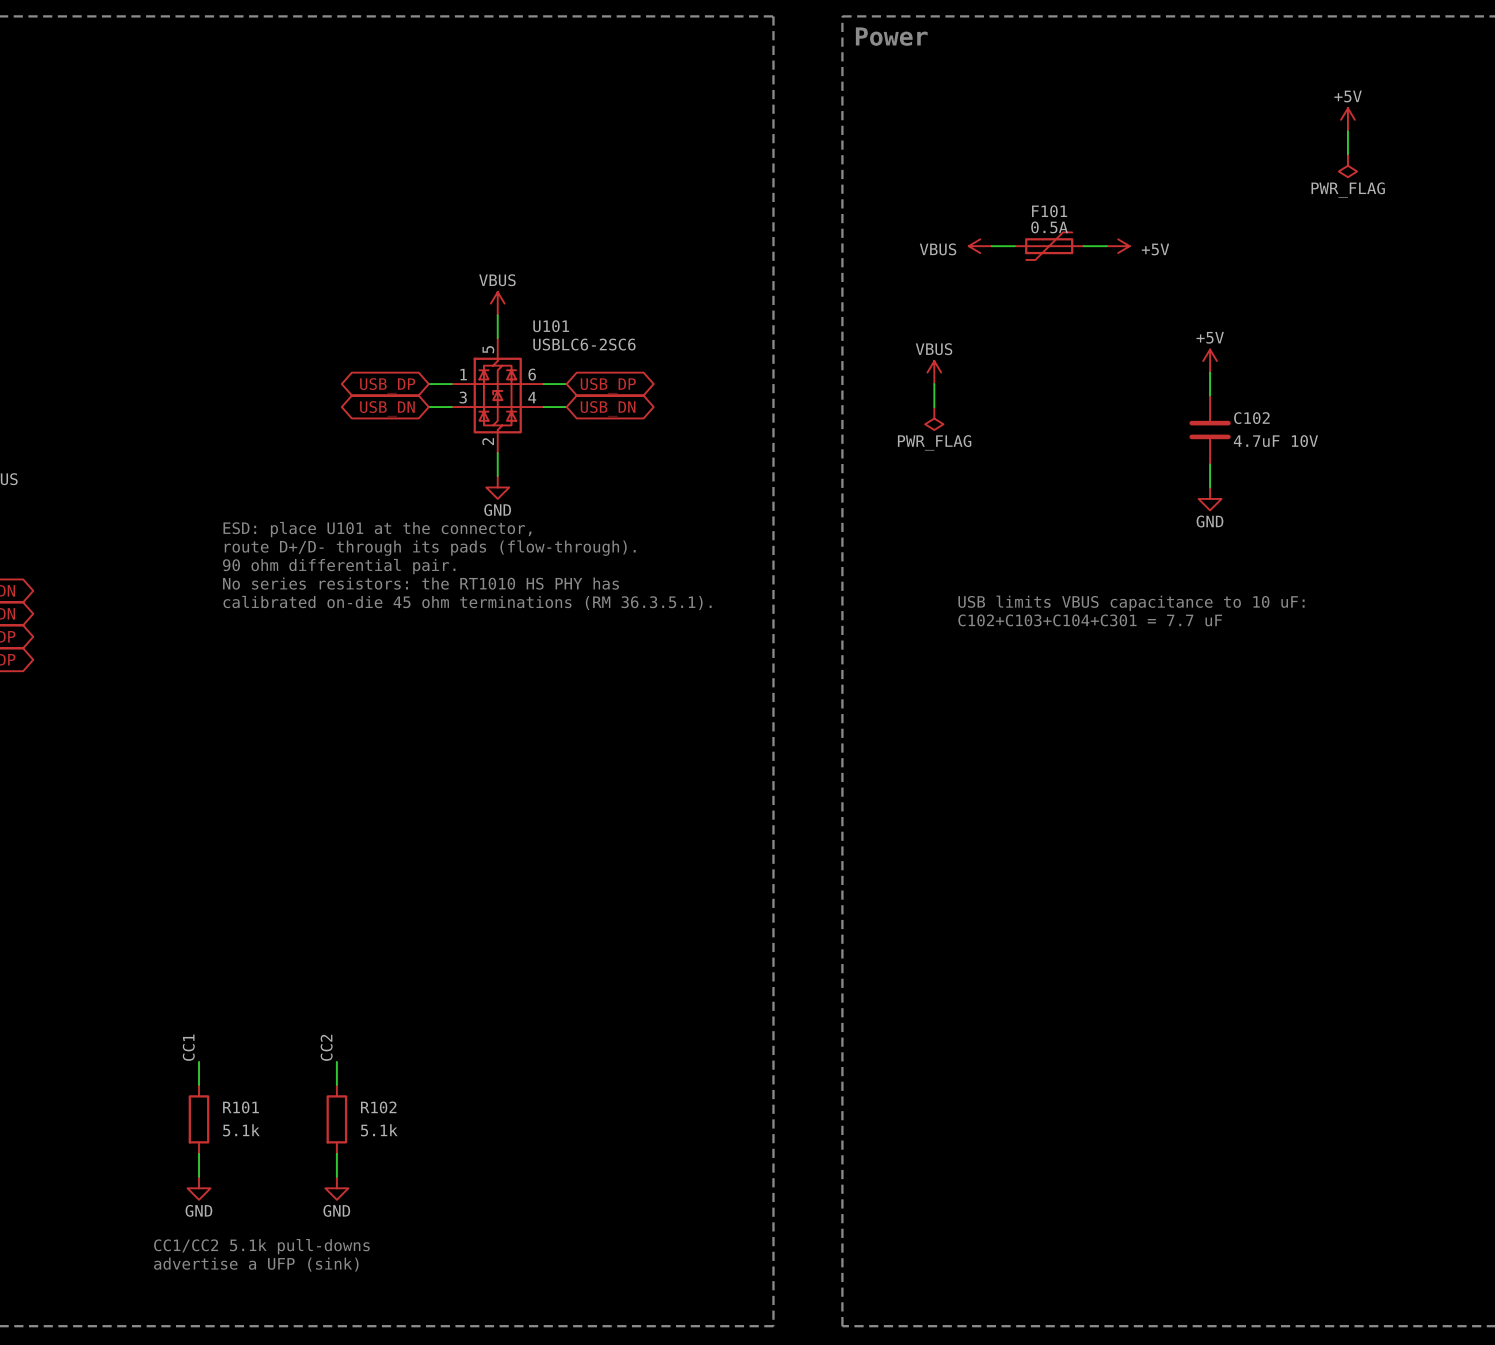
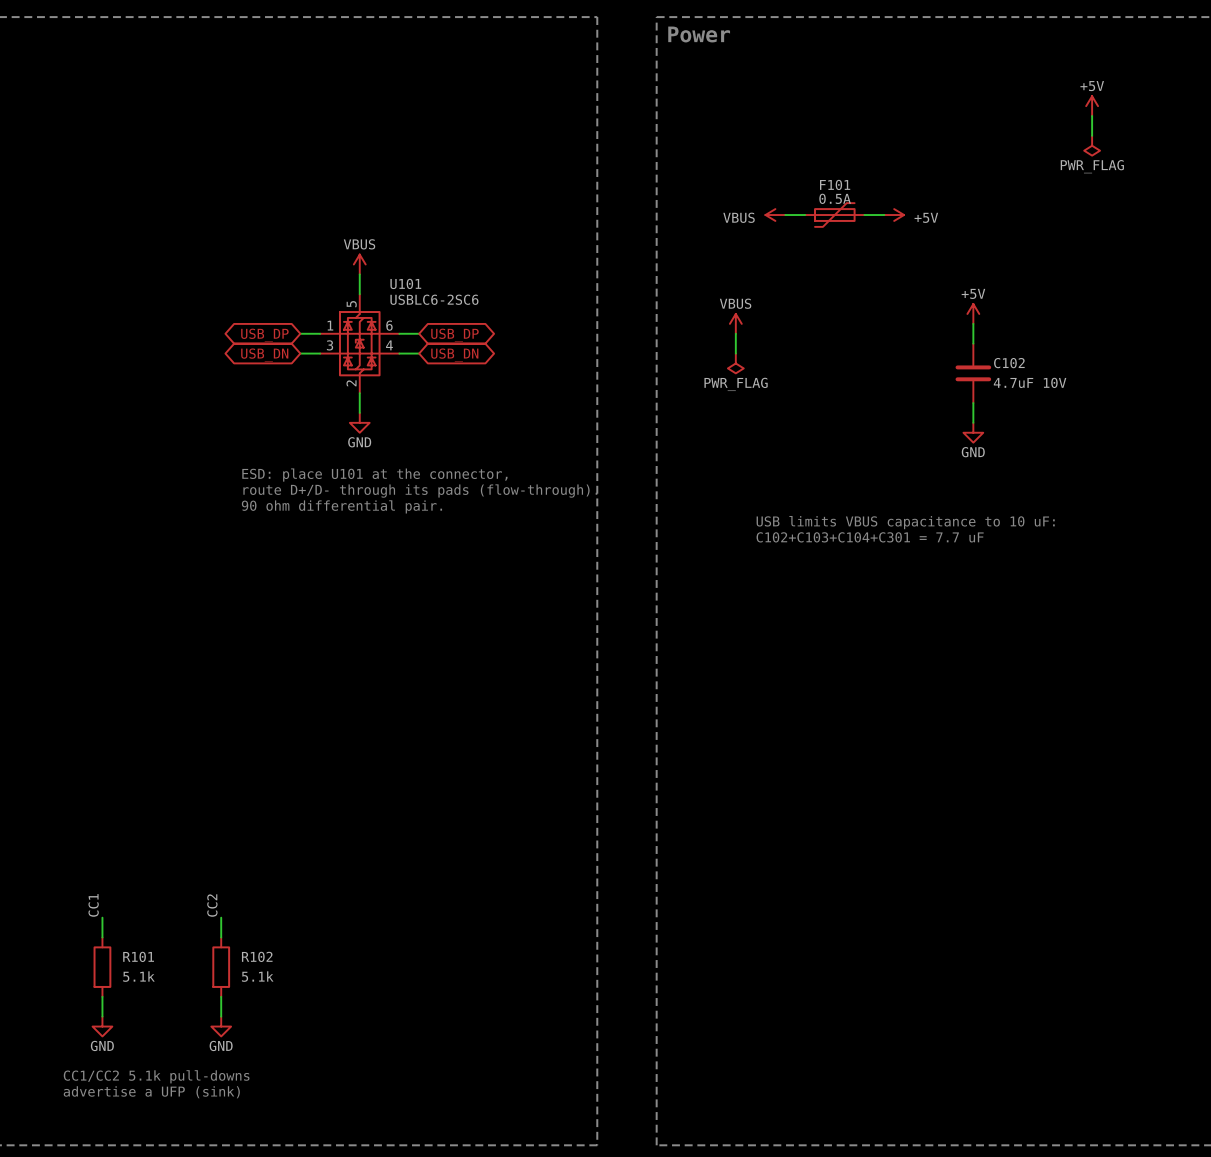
text position: ESD: place U101 at the connector, (377, 529) -> ESD: place U101 at the connector, (374, 475)
text position: route D+/D- through its pads (flow-through). (430, 548) -> route D+/D- through its pads (flow-through). (420, 491)
text position: 90 ohm differential pair. (339, 566) -> 90 ohm differential pair. (341, 506)
text: No series resistors: the RT1010 HS PHY has (420, 583) -> none
text: calibrated on-die 45 ohm terminations (RM 36.3.5.1). (467, 602) -> none

